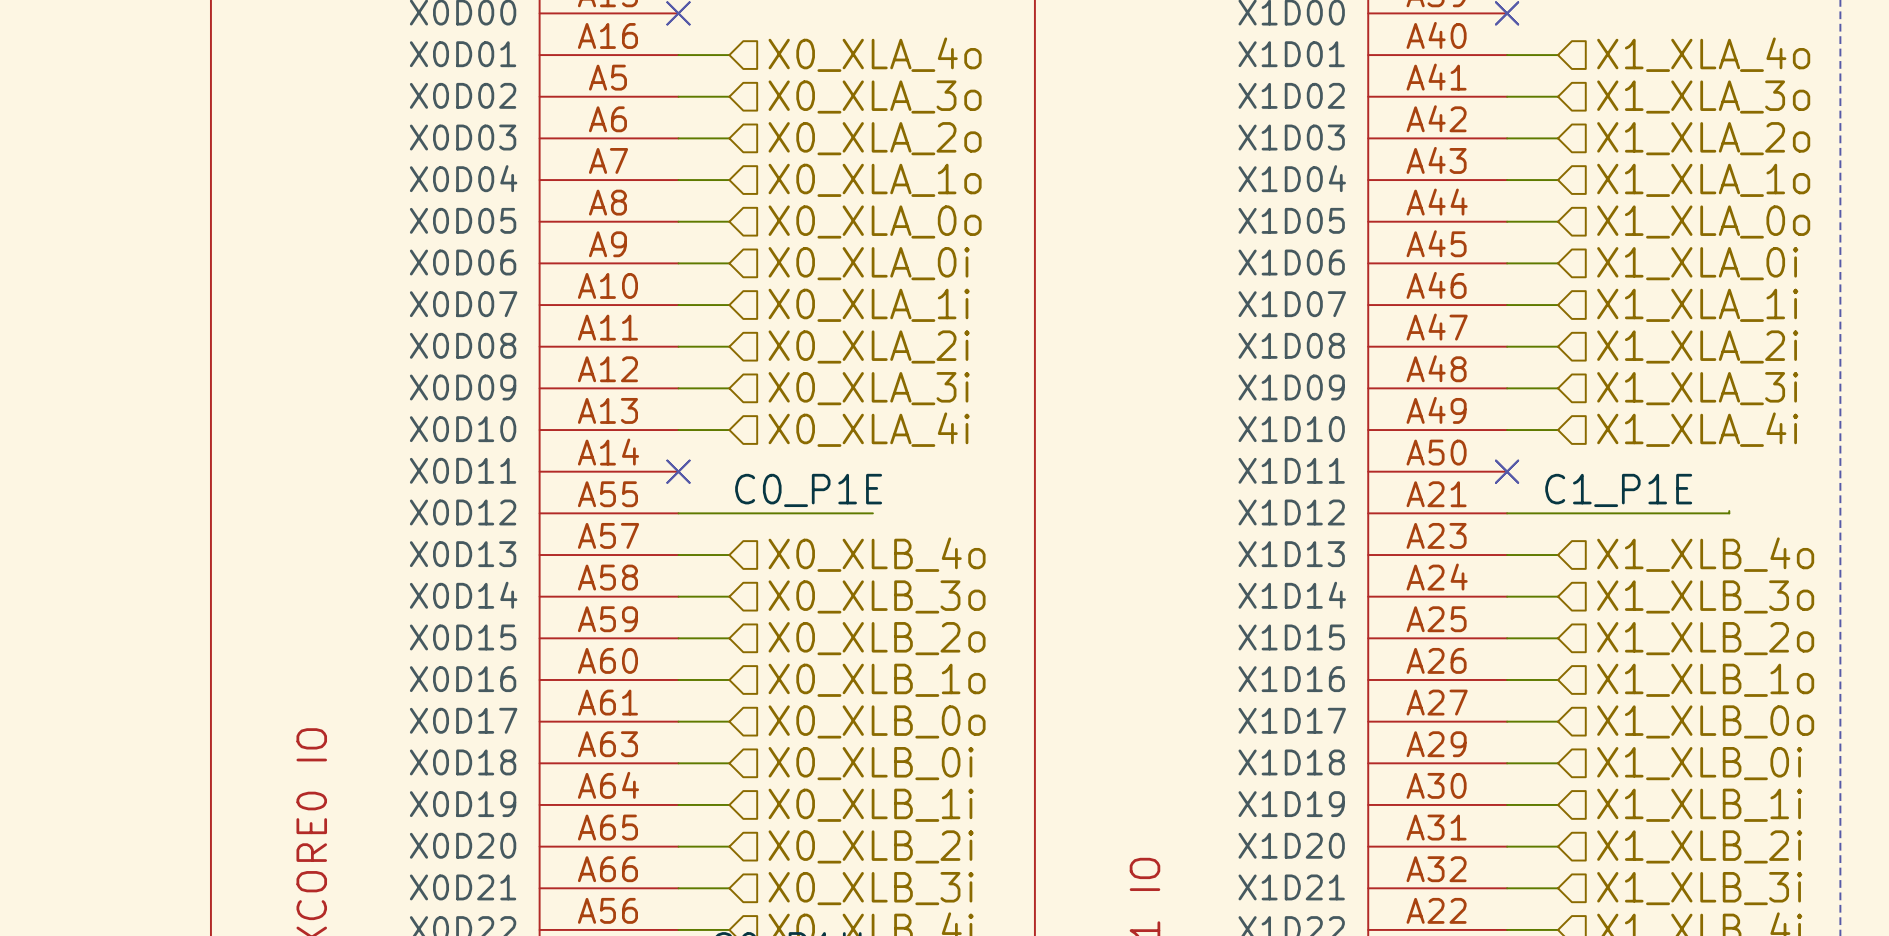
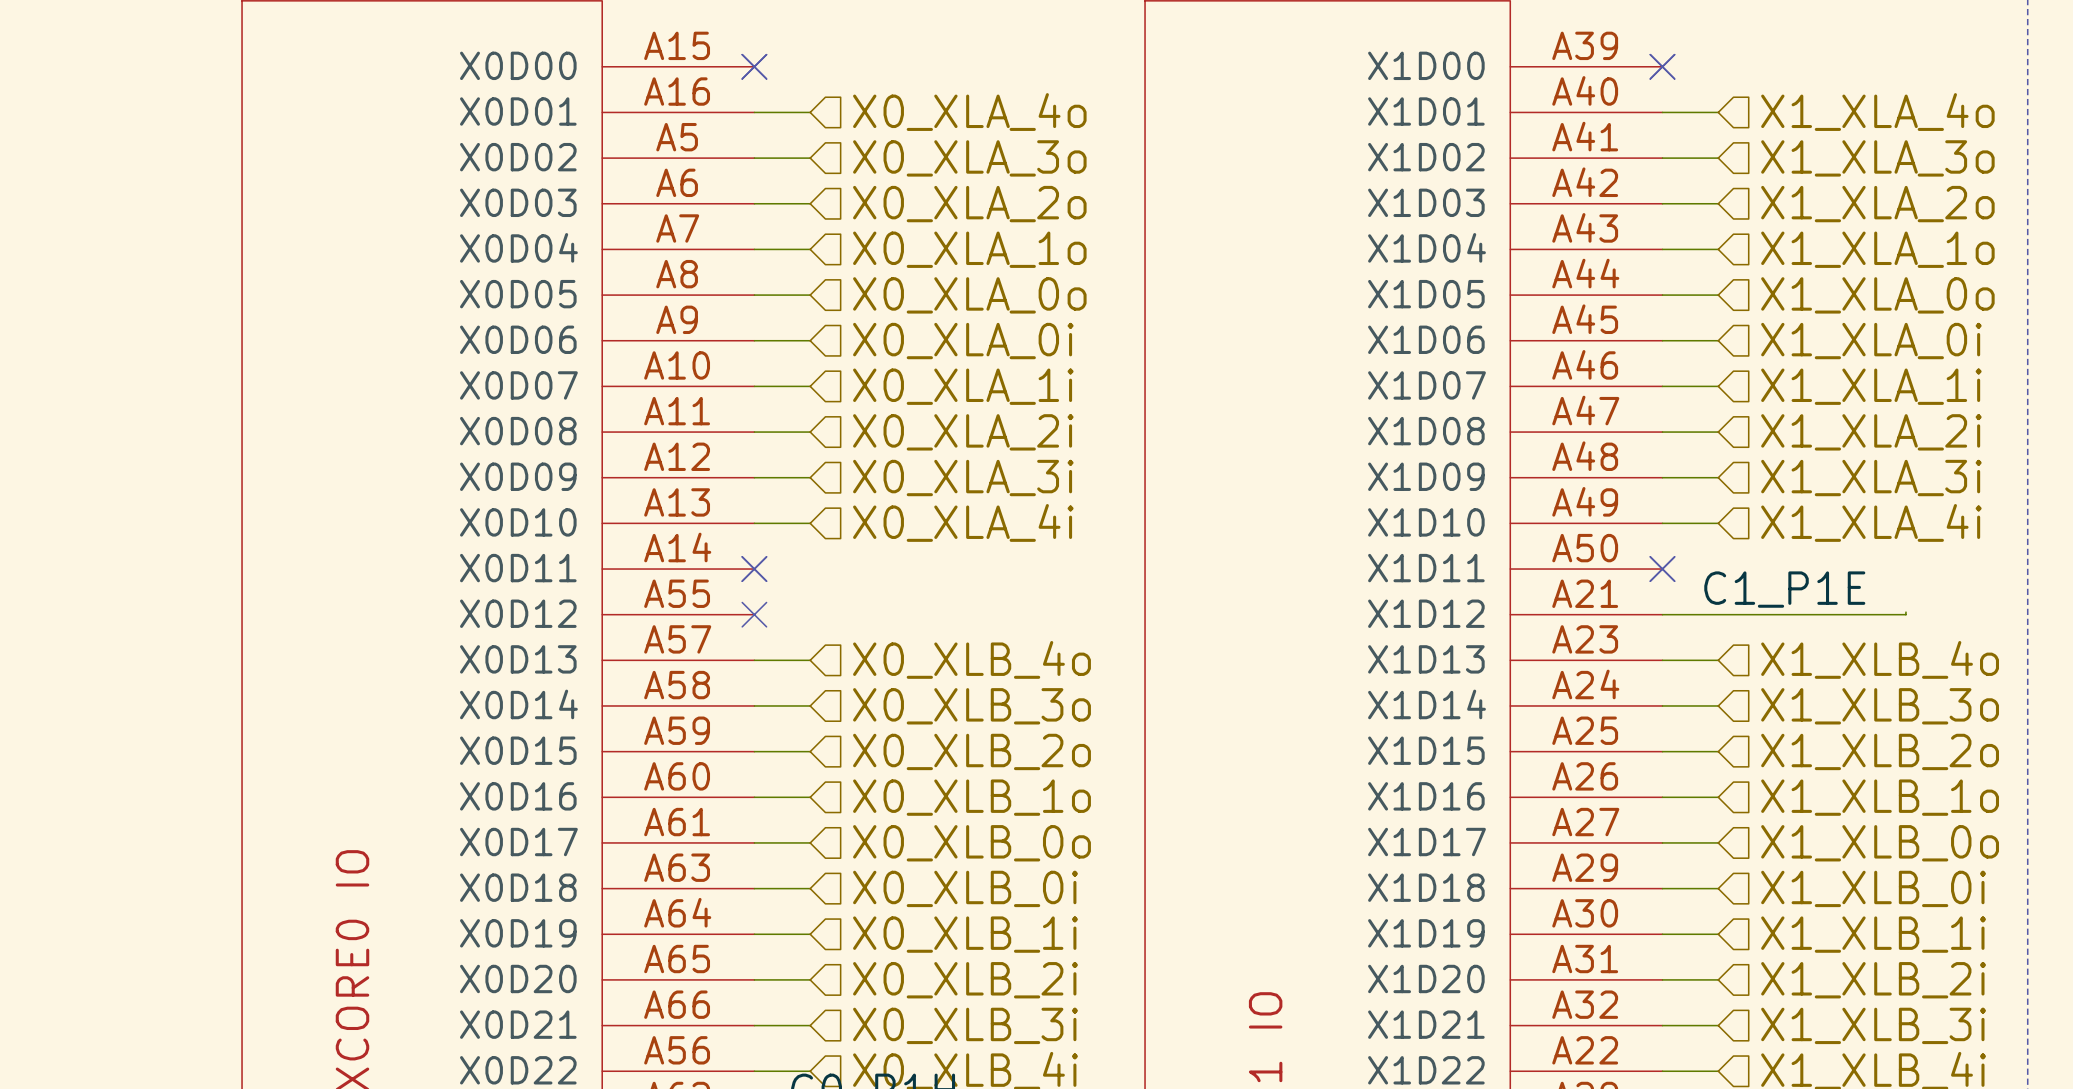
label: C0_P1E (808, 490) -> none
wire: (678, 513) (872, 513) -> none
no-connect mark: none -> (754, 614)

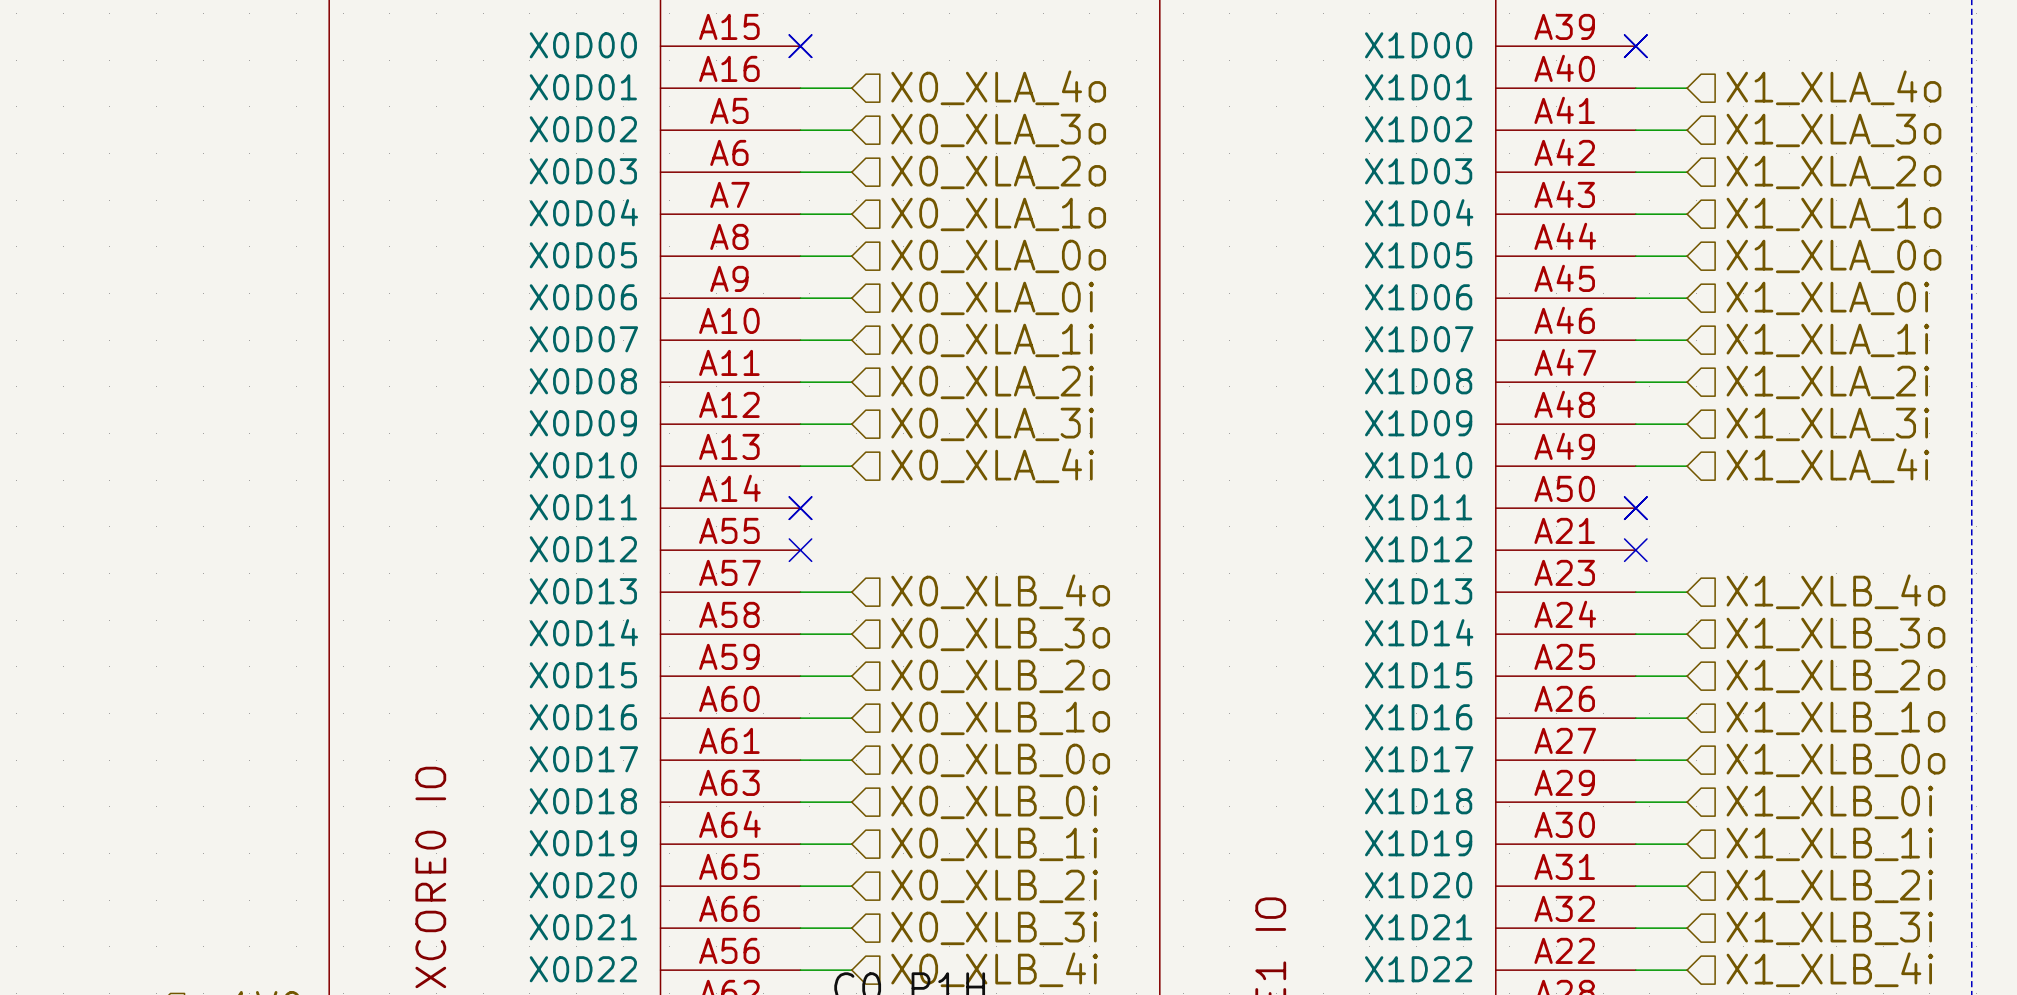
label: C1_P1E (1784, 589) -> none
wire: (1905, 612) (1905, 614) (1662, 614) -> none
no-connect mark: none -> (1635, 550)

